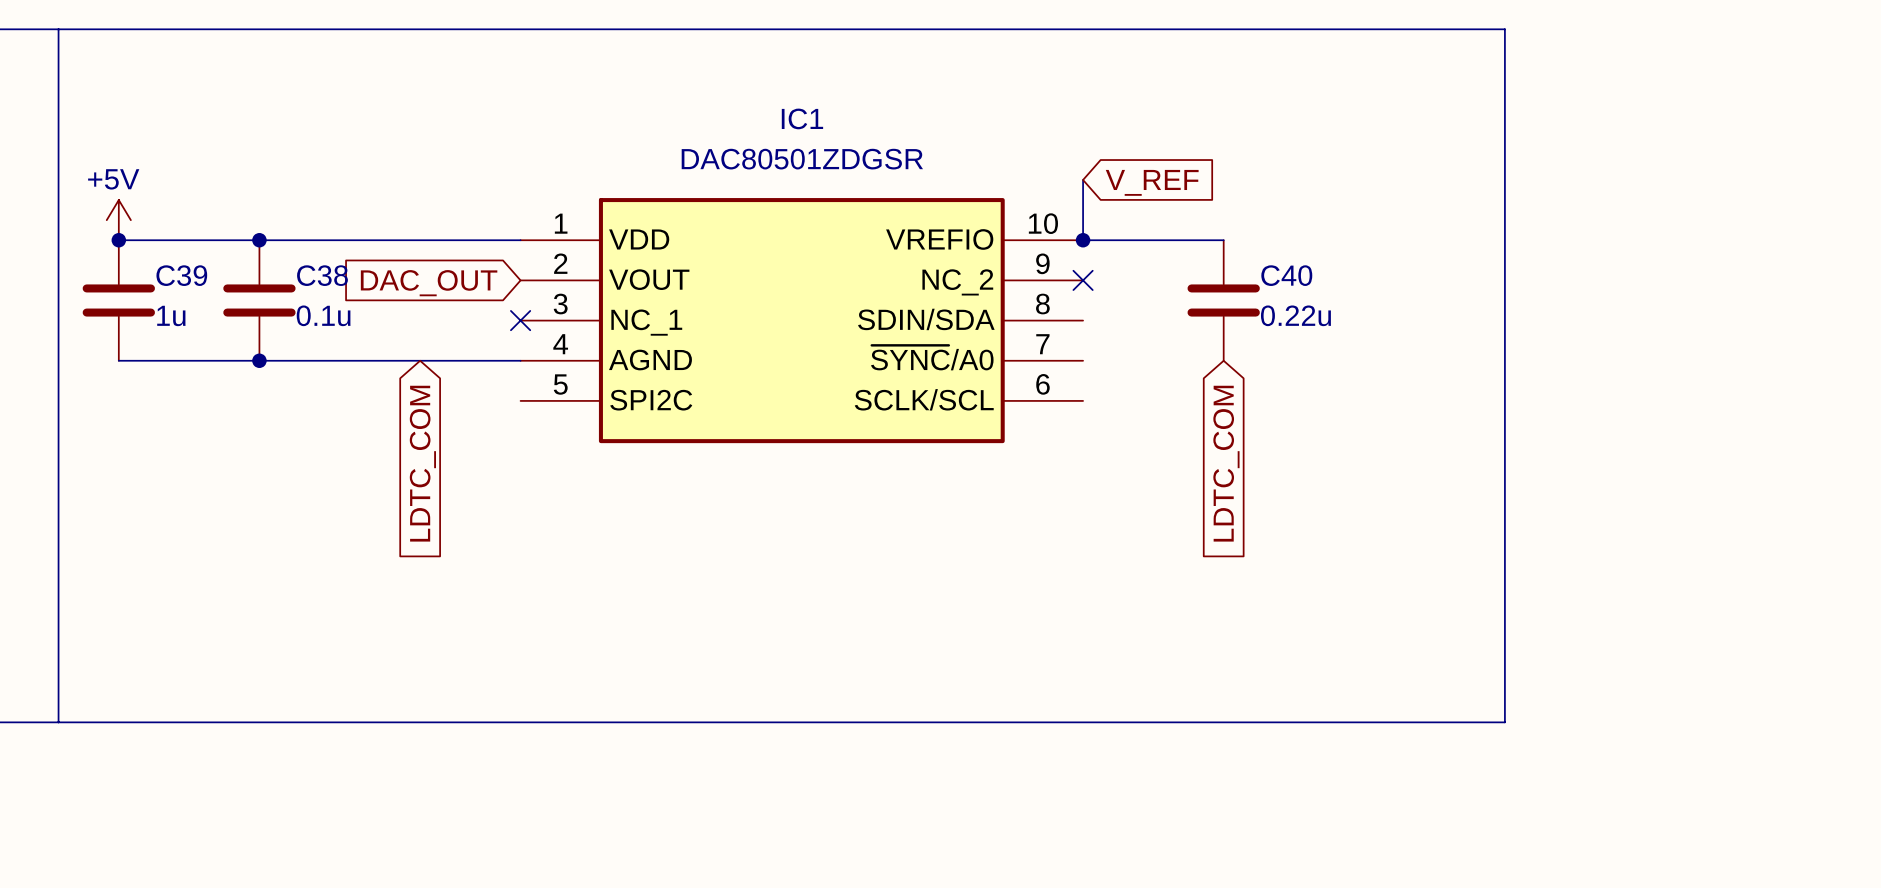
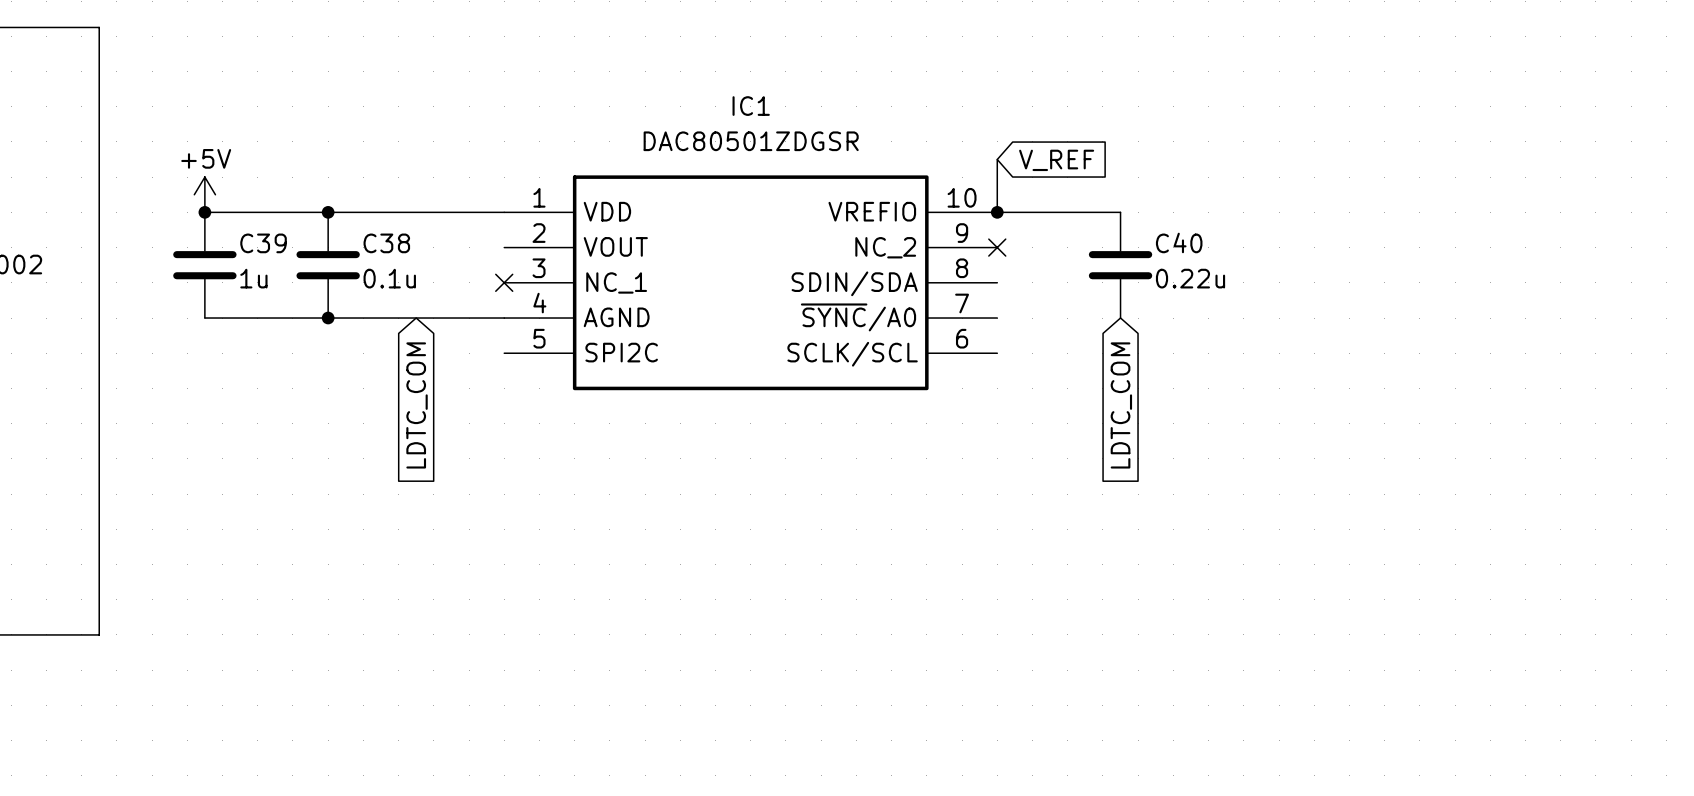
line: (58, 29) (1504, 29) (1504, 722) (58, 722) -> none
power symbol position: +5V (118, 220) -> +5V (204, 194)
wire: (118, 240) (179, 240) -> none
junction: (118, 240) -> none
junction: none -> (204, 212)
junction: (259, 240) -> none
junction: none -> (328, 212)
global label: DAC_OUT (429, 283) -> none
C39 position: (118, 300) -> (204, 265)
C38 position: (259, 300) -> (328, 265)
wire: (118, 360) (179, 360) -> none
junction position: (259, 360) -> (328, 318)

